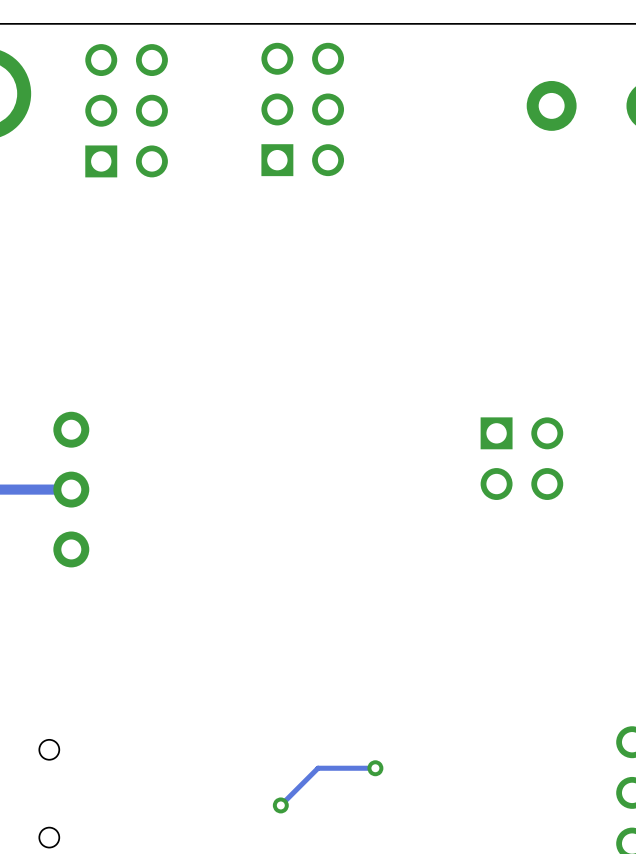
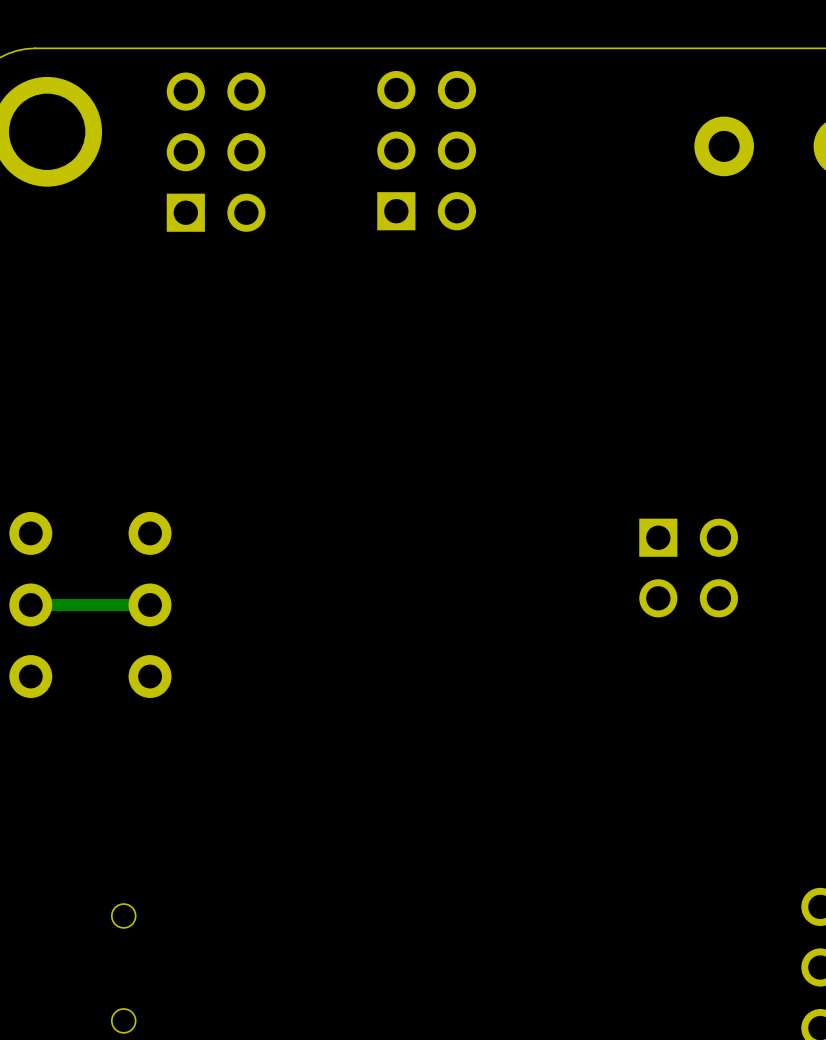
track: (375, 768) (318, 768) (280, 805) -> none
via: (375, 768) -> none
via: (280, 805) -> none

